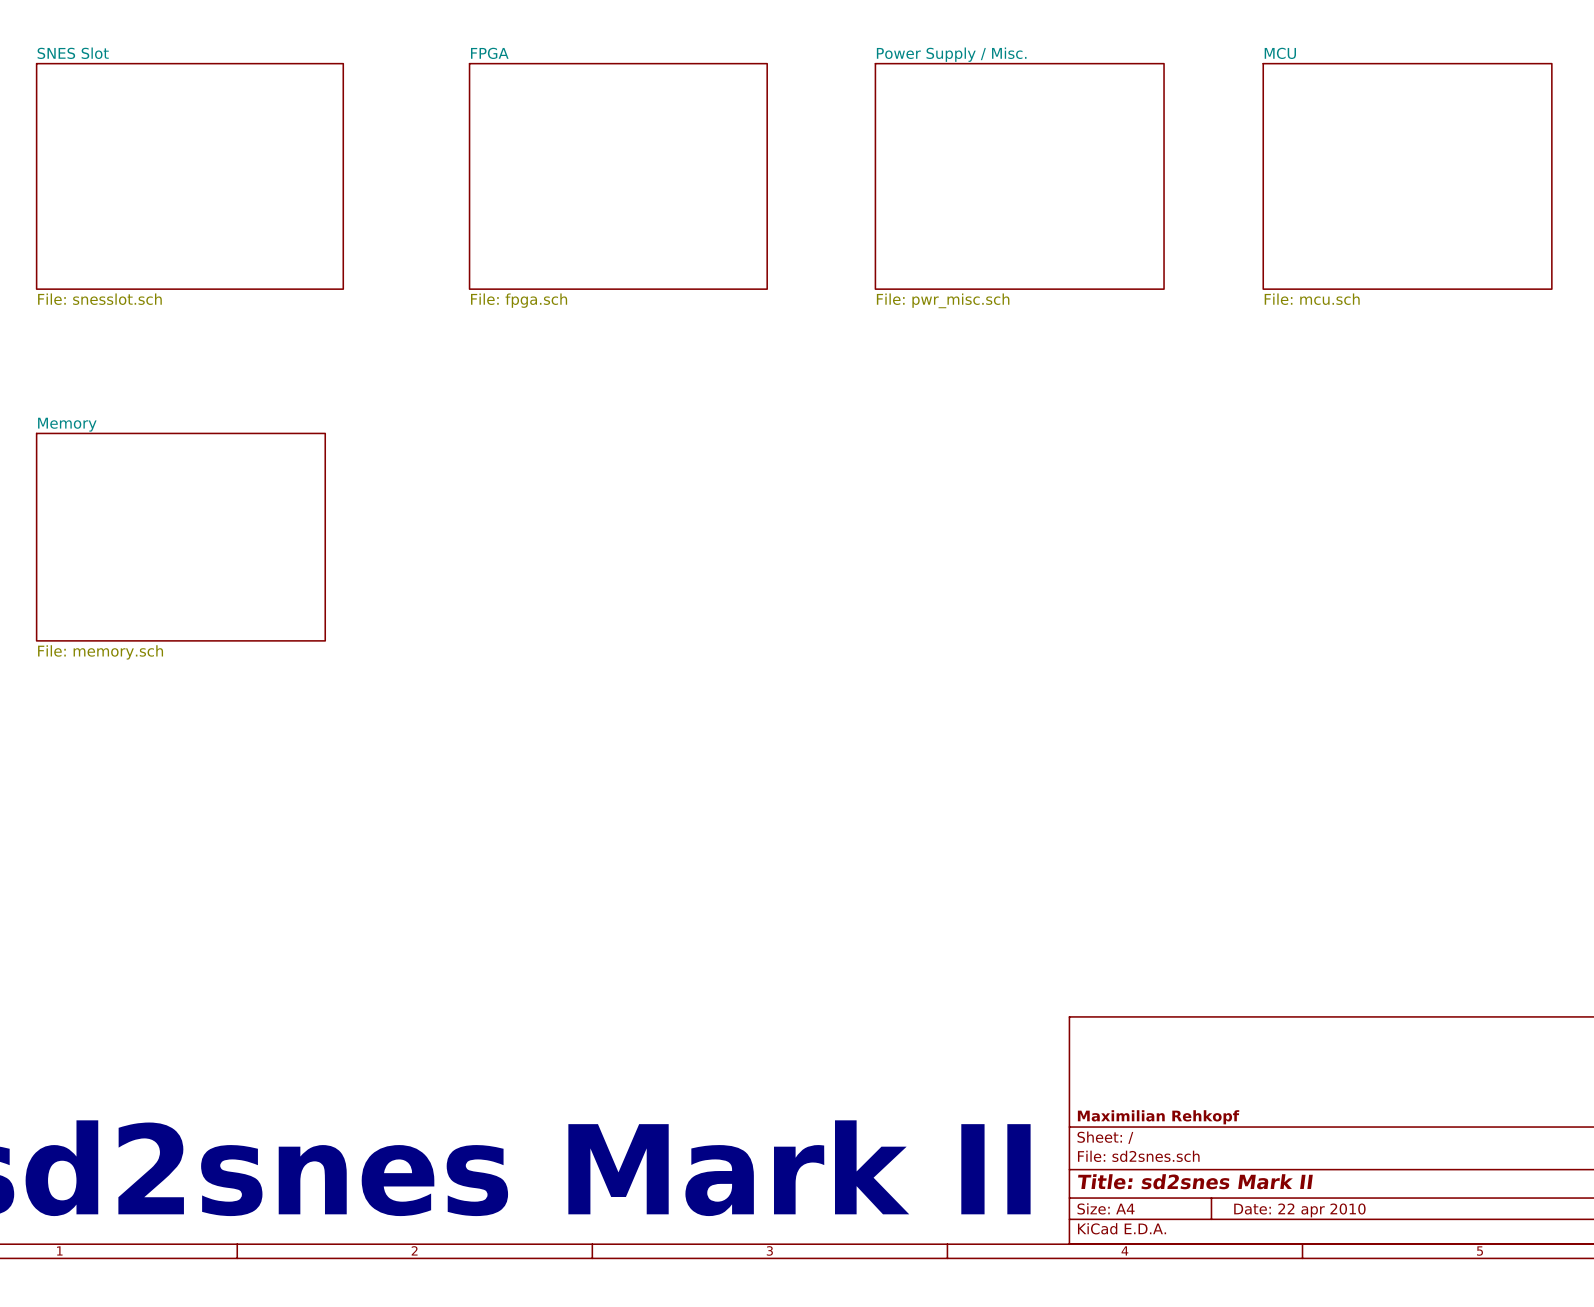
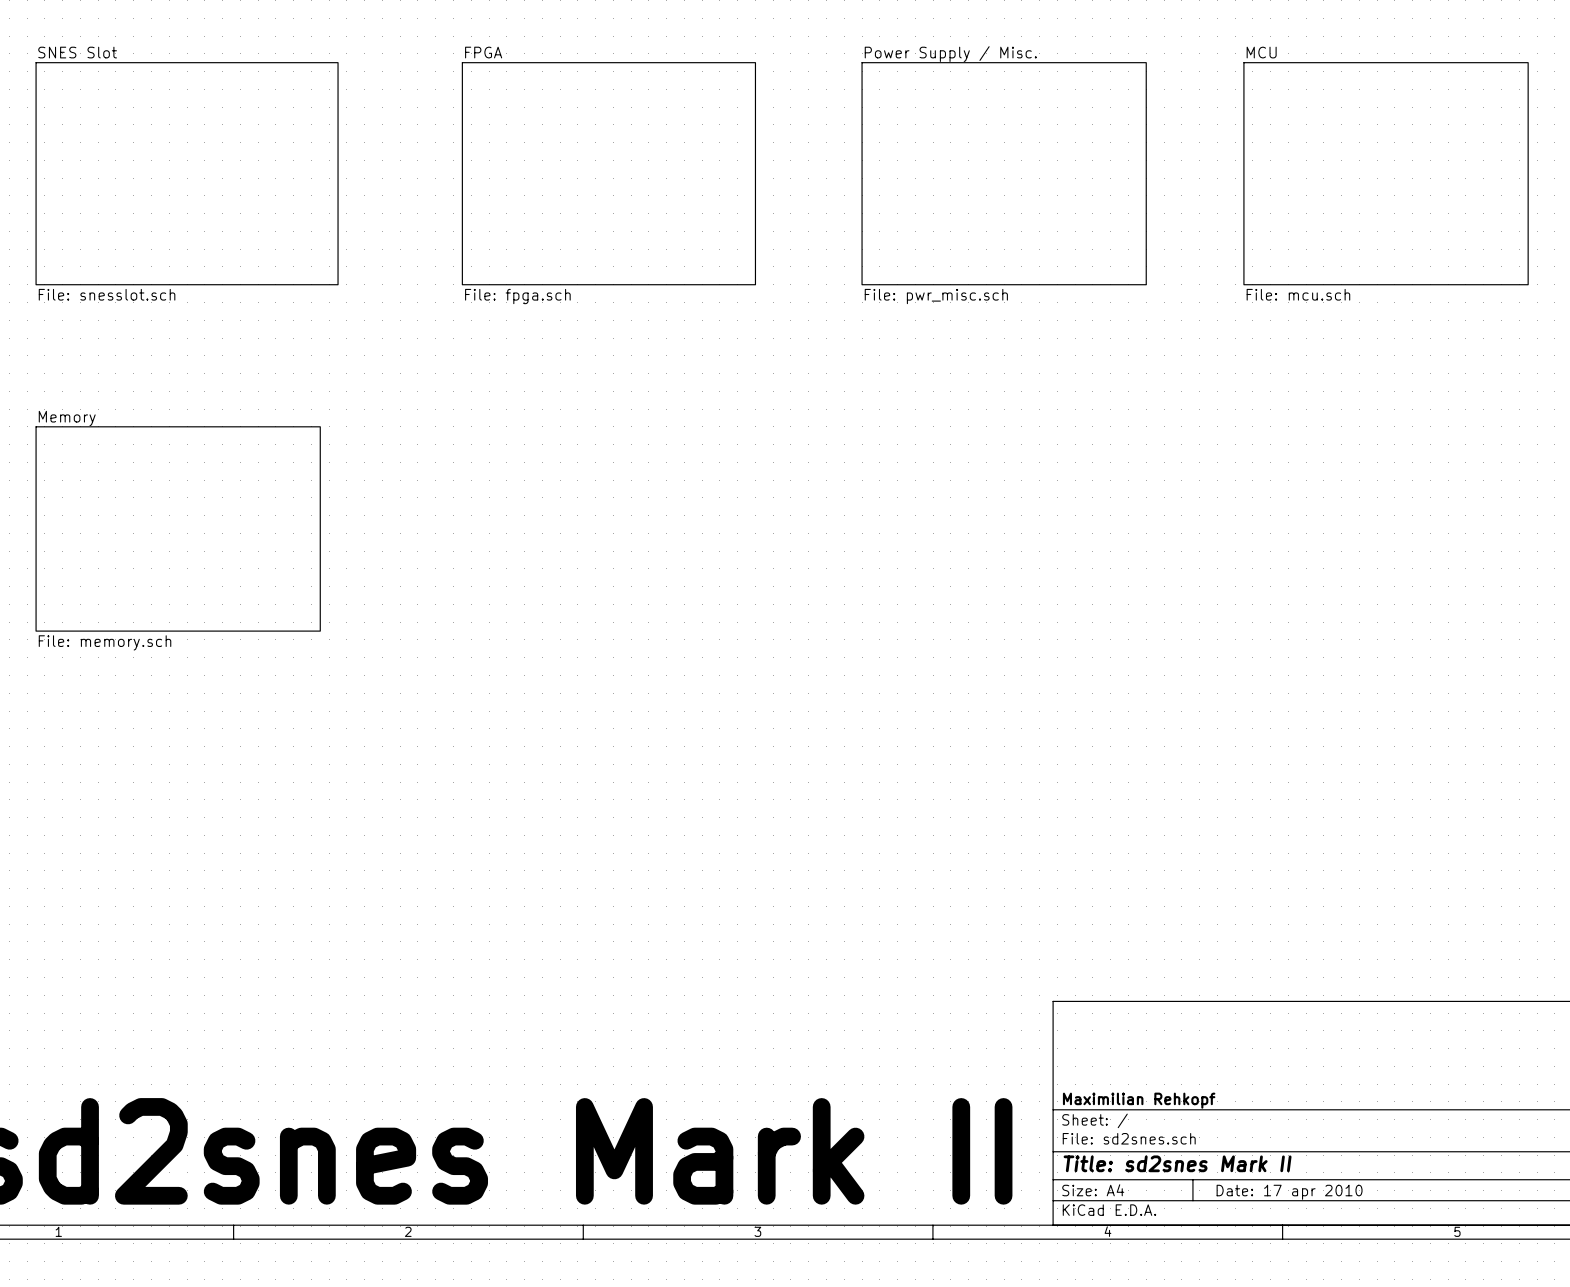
title block: Date: 22 apr 2010 (1299, 1210) -> Date: 17 apr 2010 (1289, 1192)

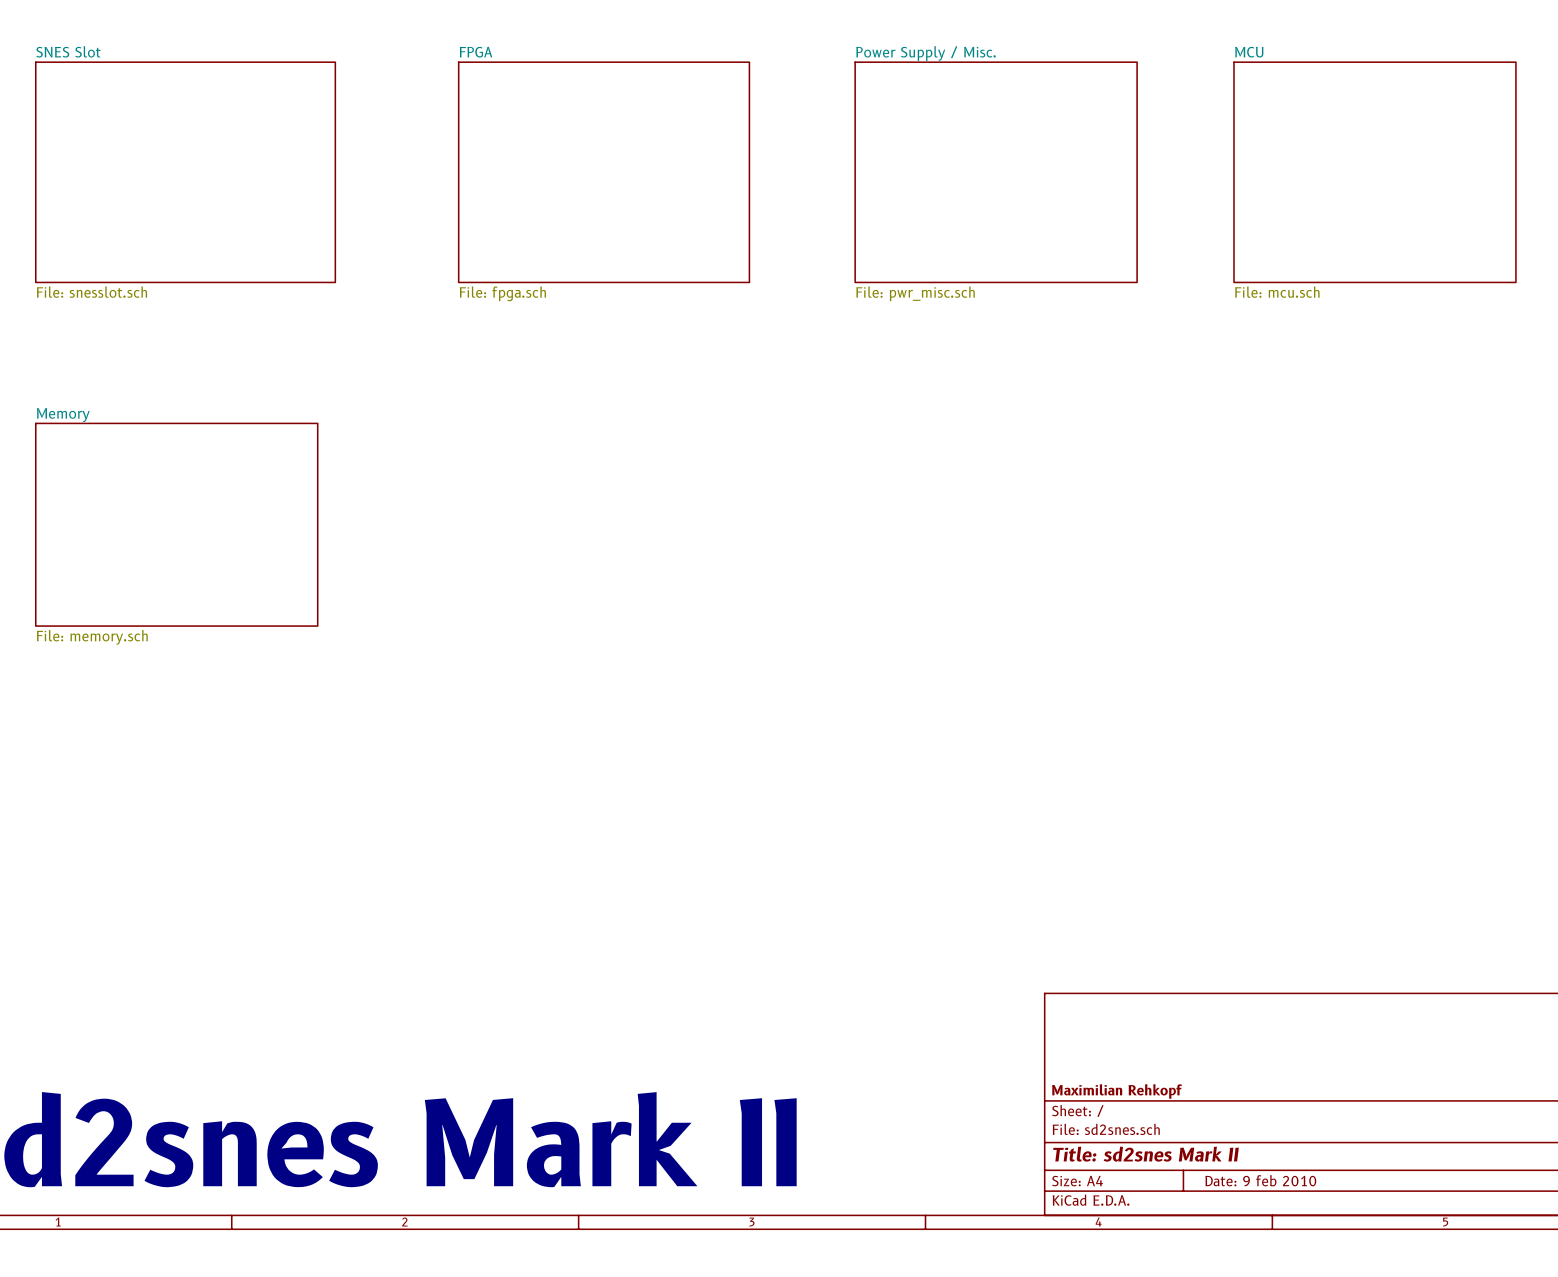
title block: Date: 17 apr 2010 (1289, 1192) -> Date: 9 feb 2010 (1260, 1180)

